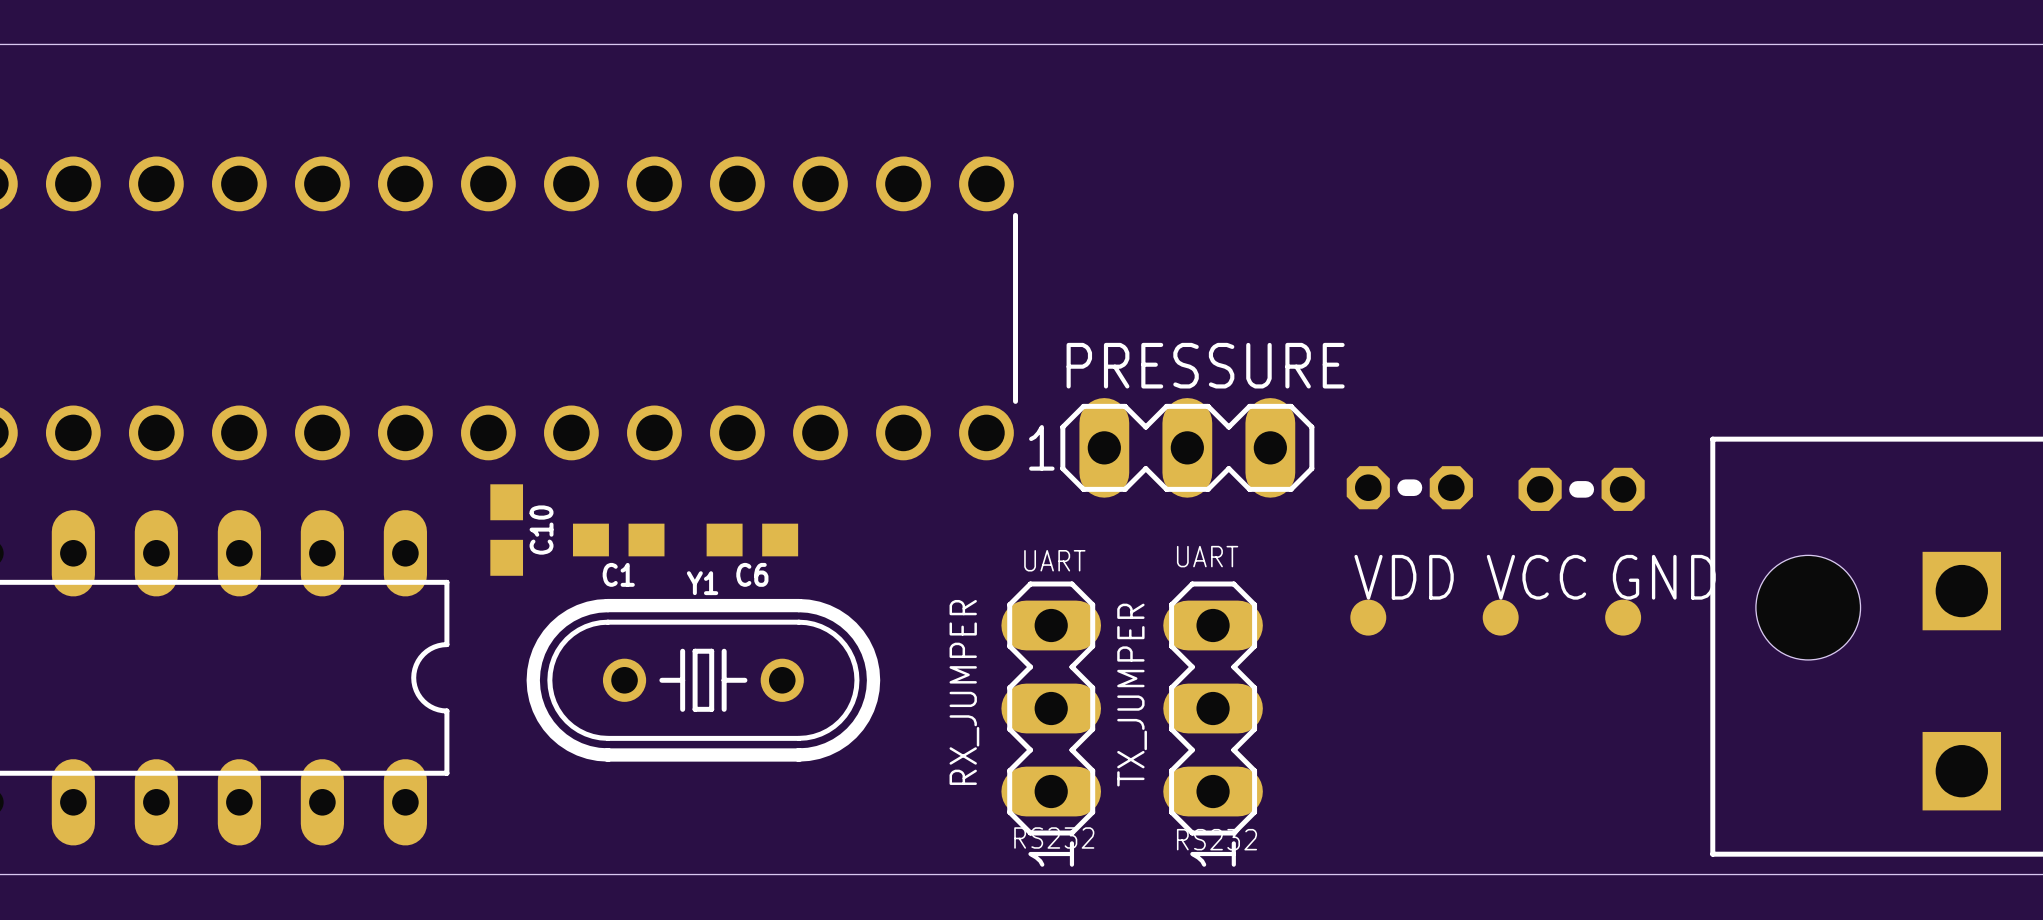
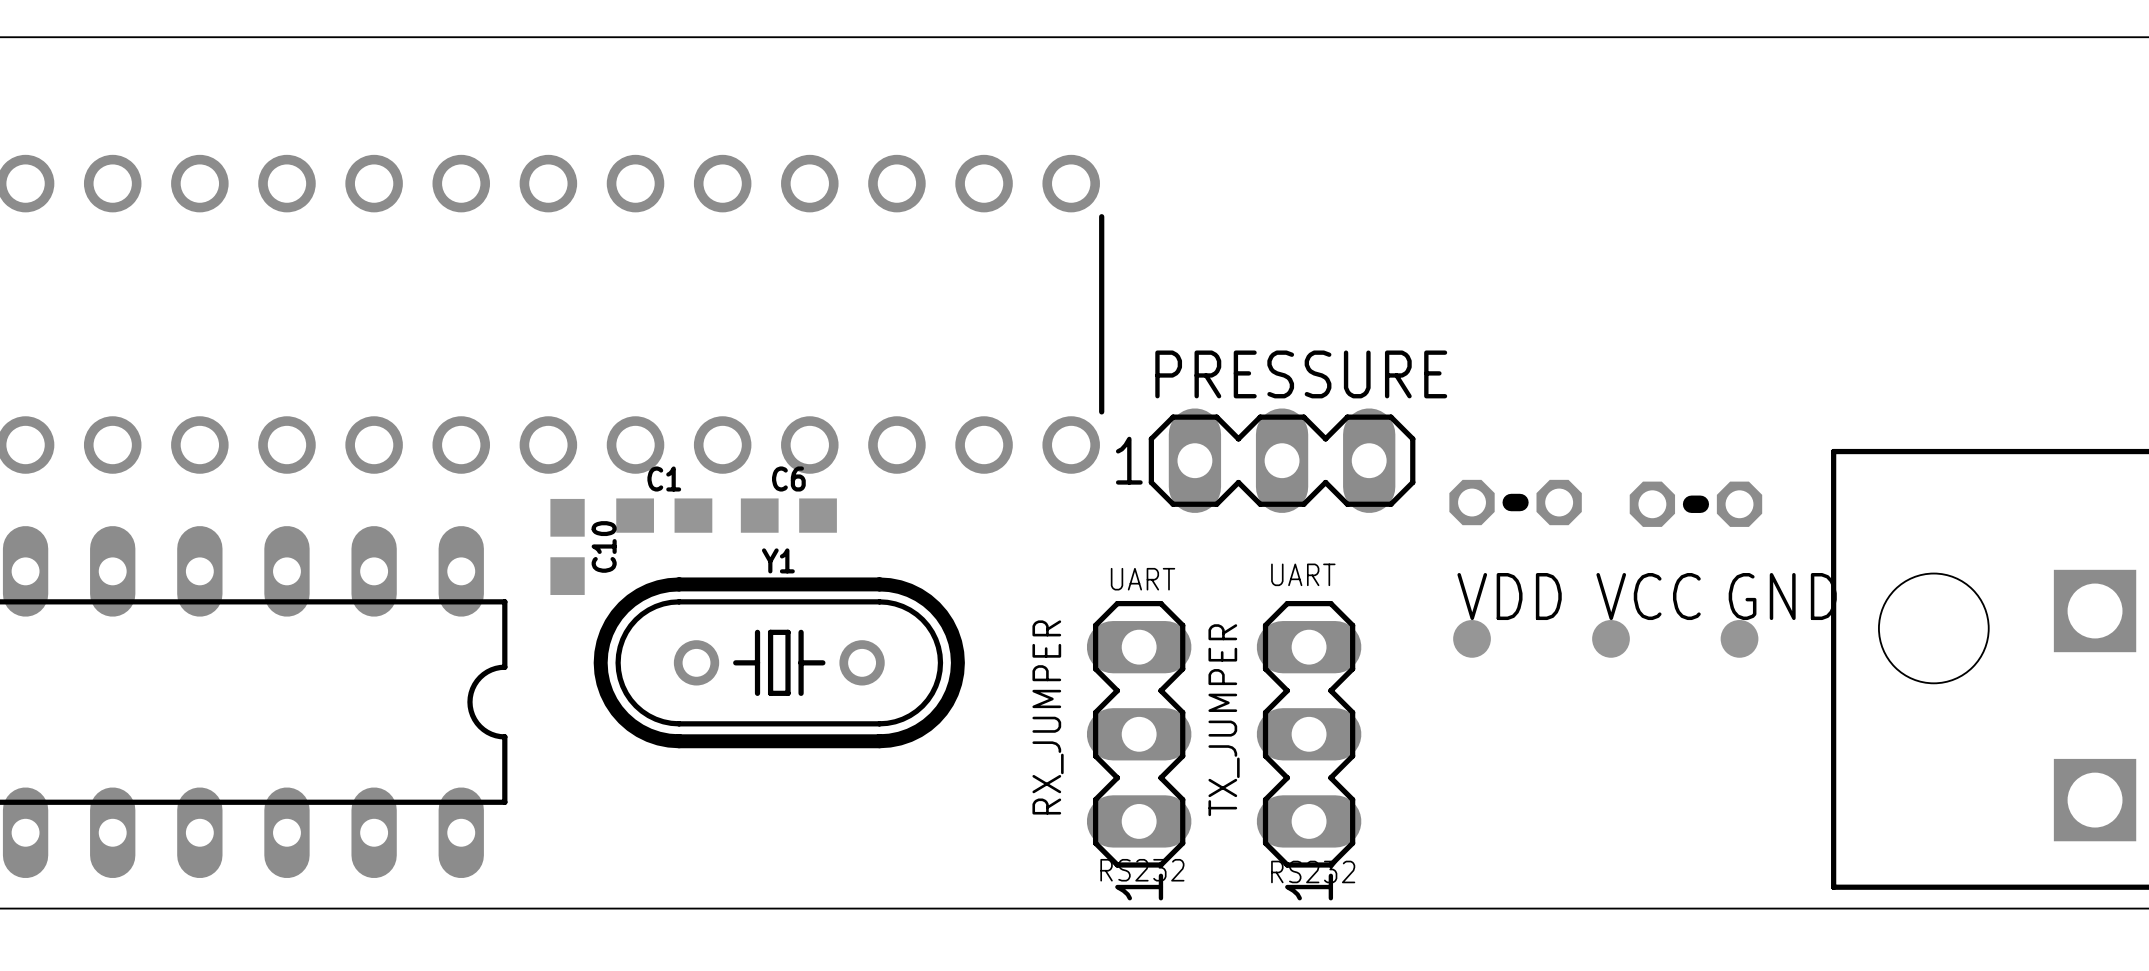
C1 position: (618, 540) -> (664, 515)
C6 position: (752, 540) -> (788, 515)
C1 name position: C1 (618, 574) -> C1 (664, 478)
C6 name position: C6 (752, 574) -> C6 (788, 478)
Y1 position: (703, 680) -> (779, 662)

